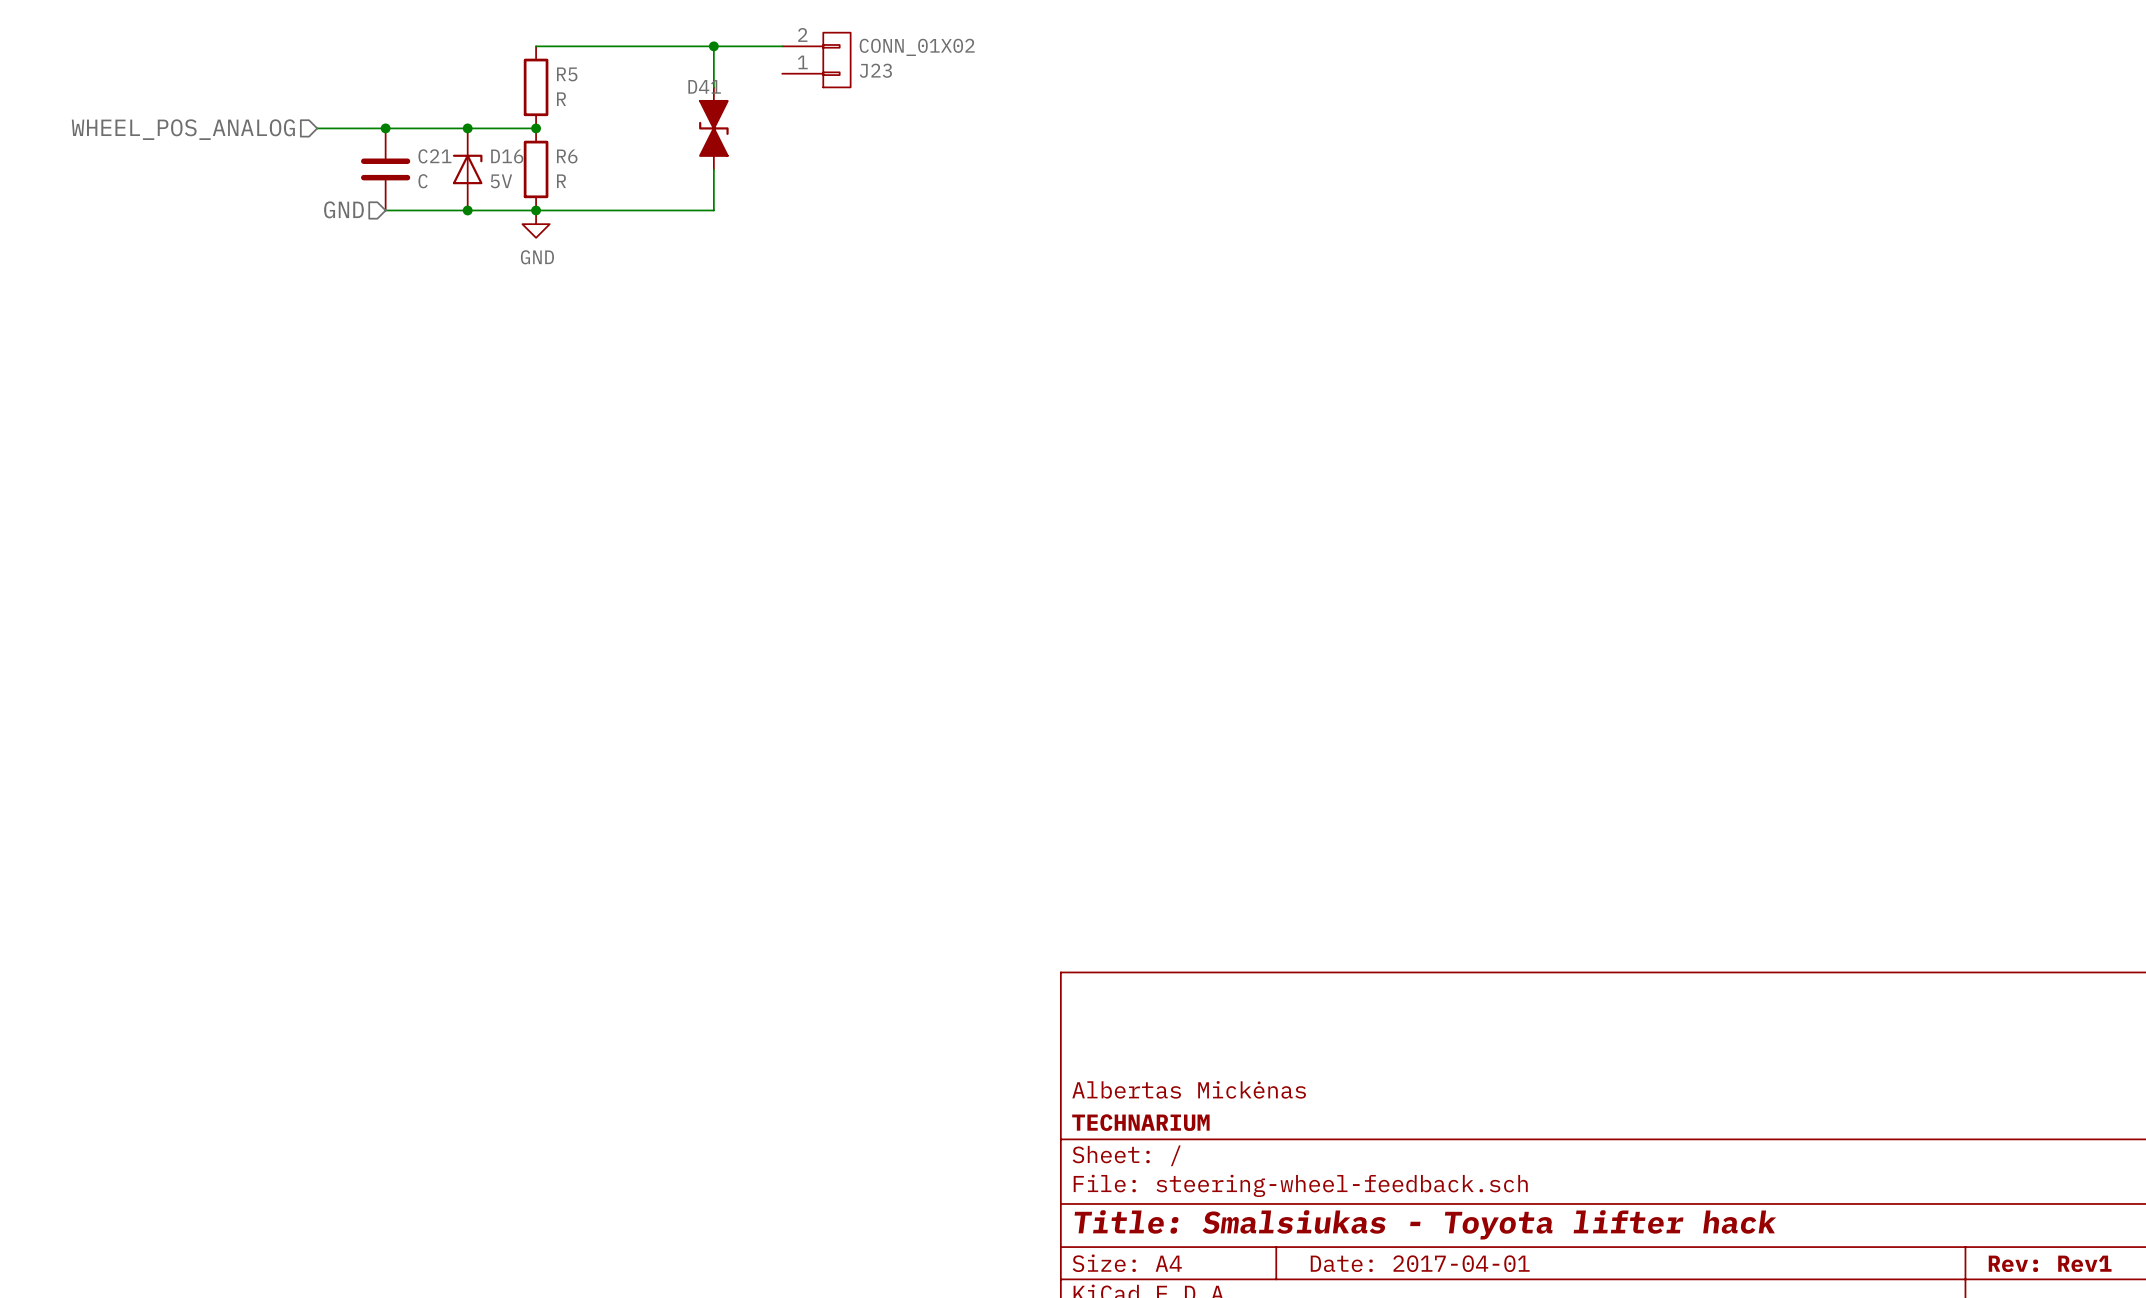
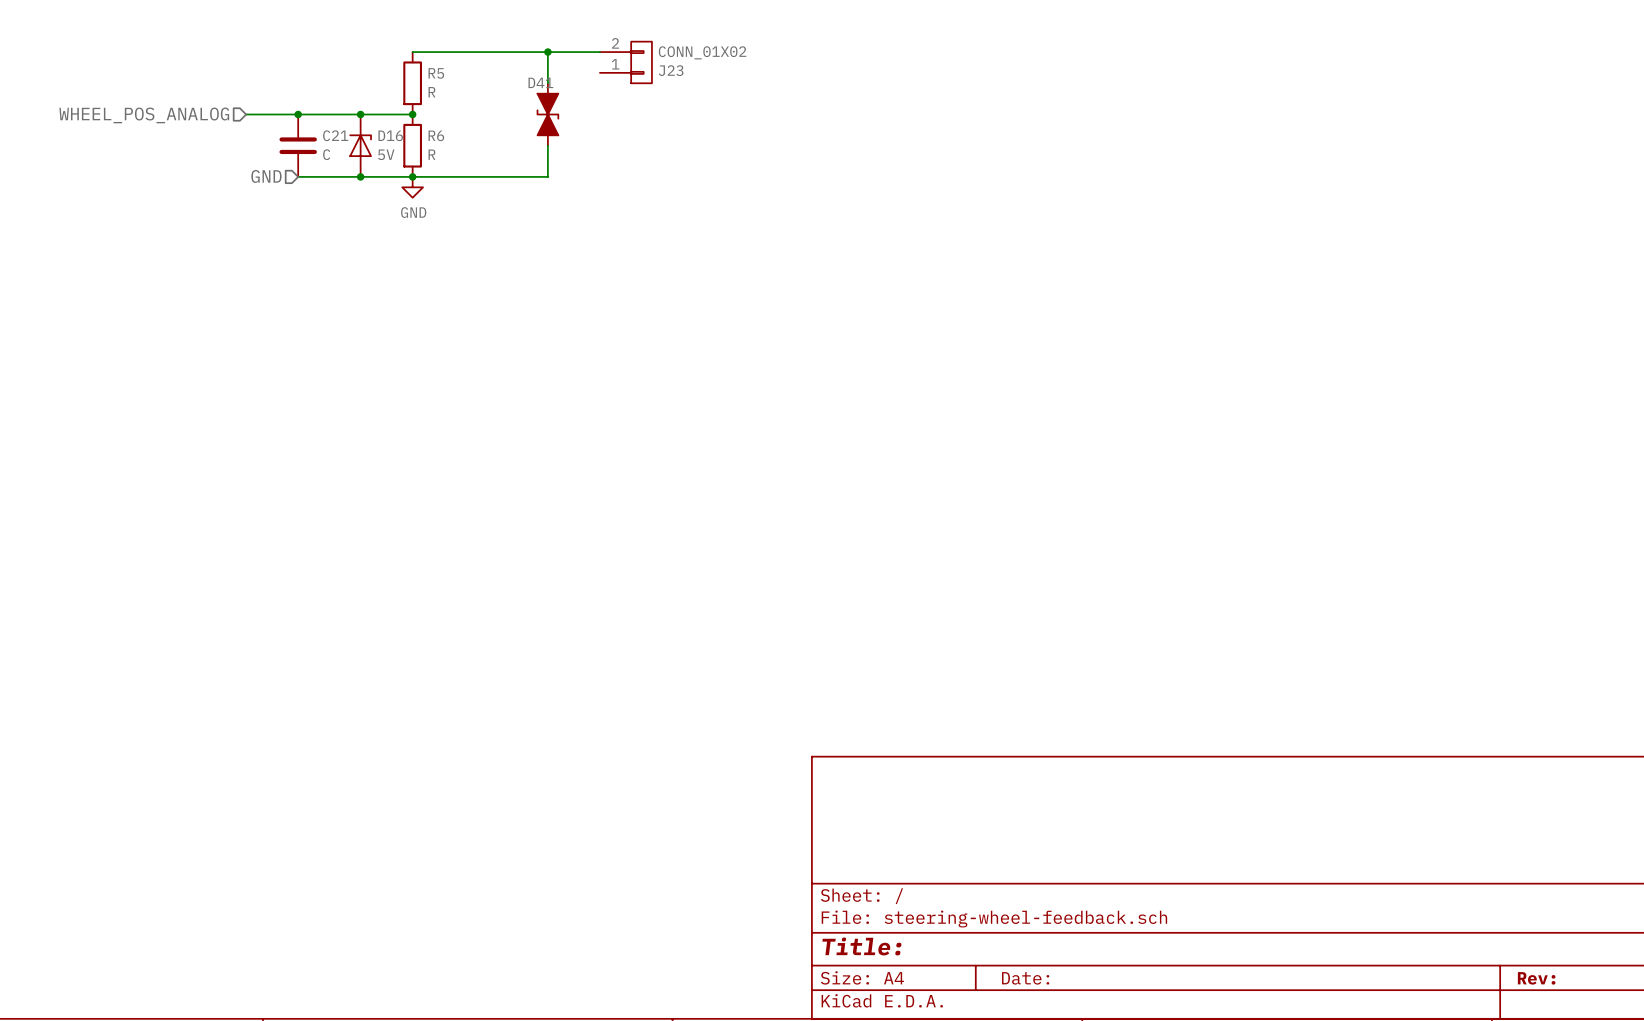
title block: Albertas Mickėnas (1189, 1089) -> none
title block: TECHNARIUM (1140, 1122) -> none
title block: Title: Smalsiukas - Toyota lifter hack (1425, 1224) -> Title: (861, 946)
title block: Date: 2017-04-01 (1420, 1263) -> Date: (1025, 978)
title block: Rev: Rev1 (2050, 1263) -> Rev: (1536, 978)

